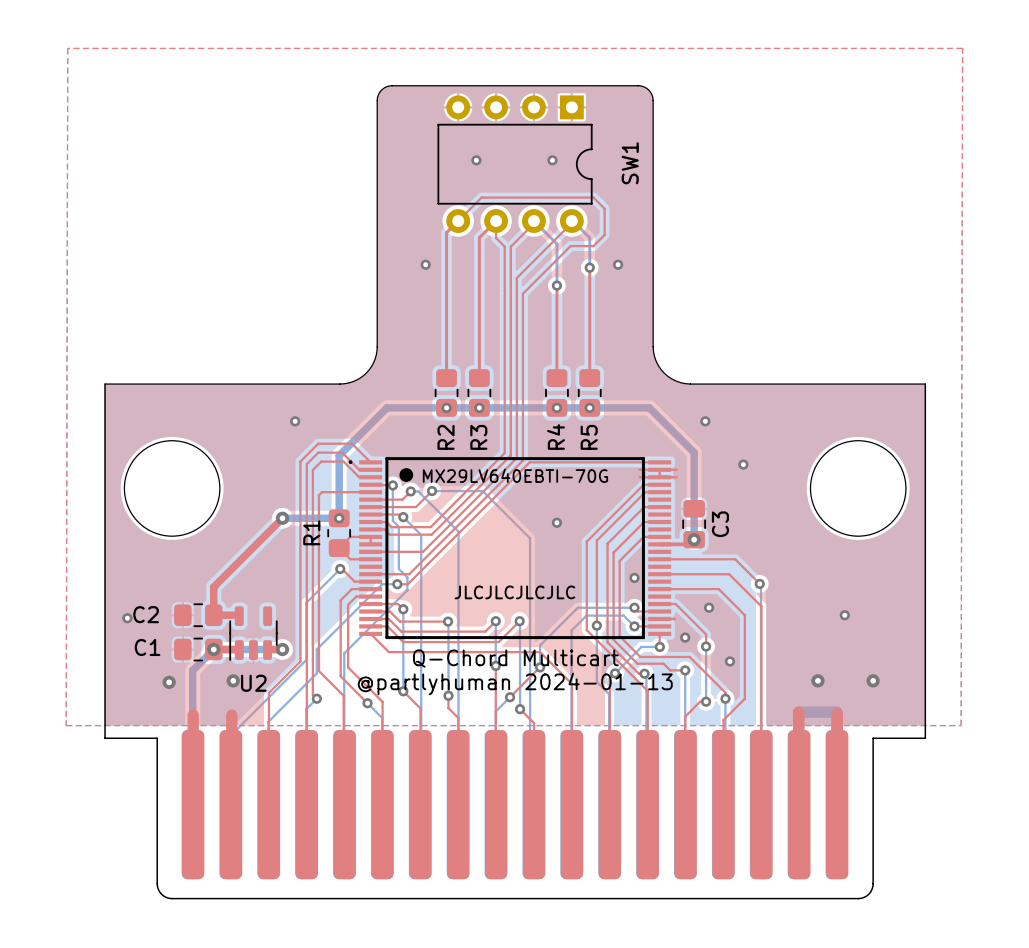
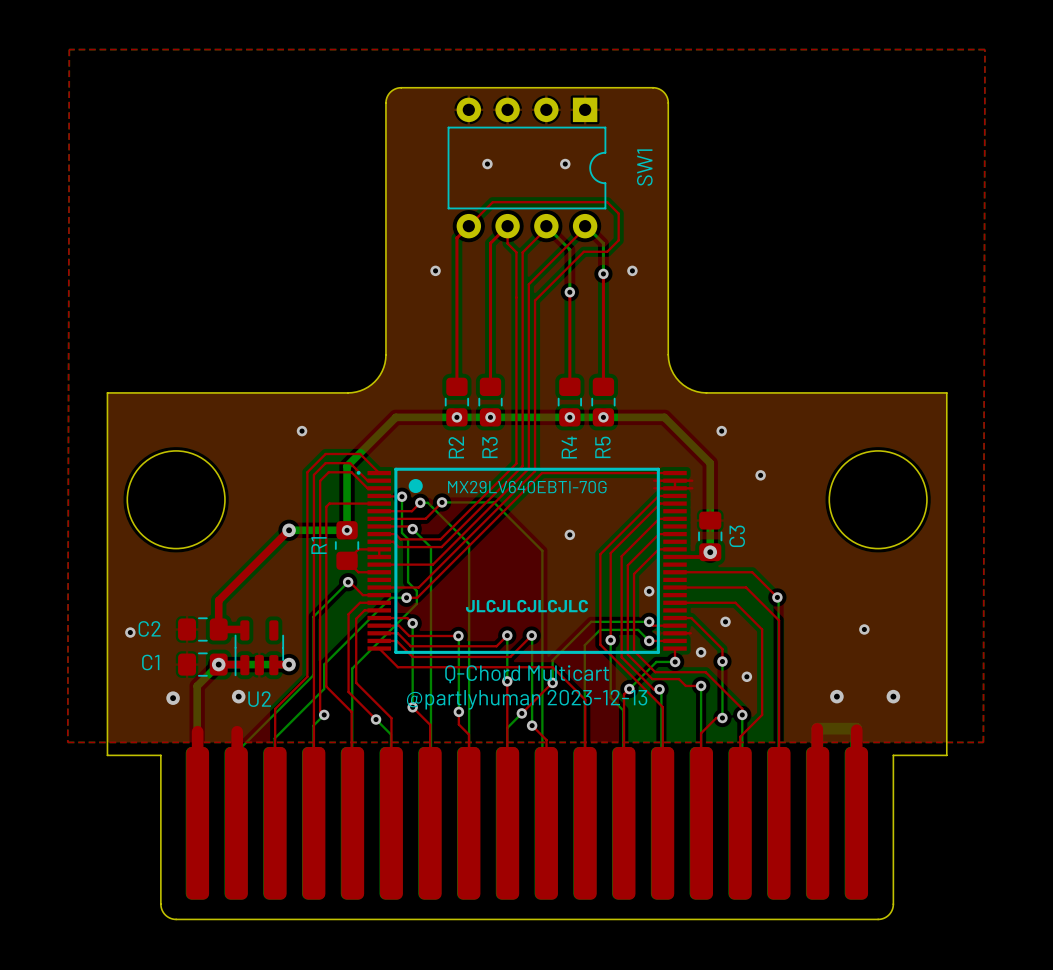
text: @partlyhuman 2024-01-13 (515, 683) -> @partlyhuman 2023-12-13 (527, 699)

